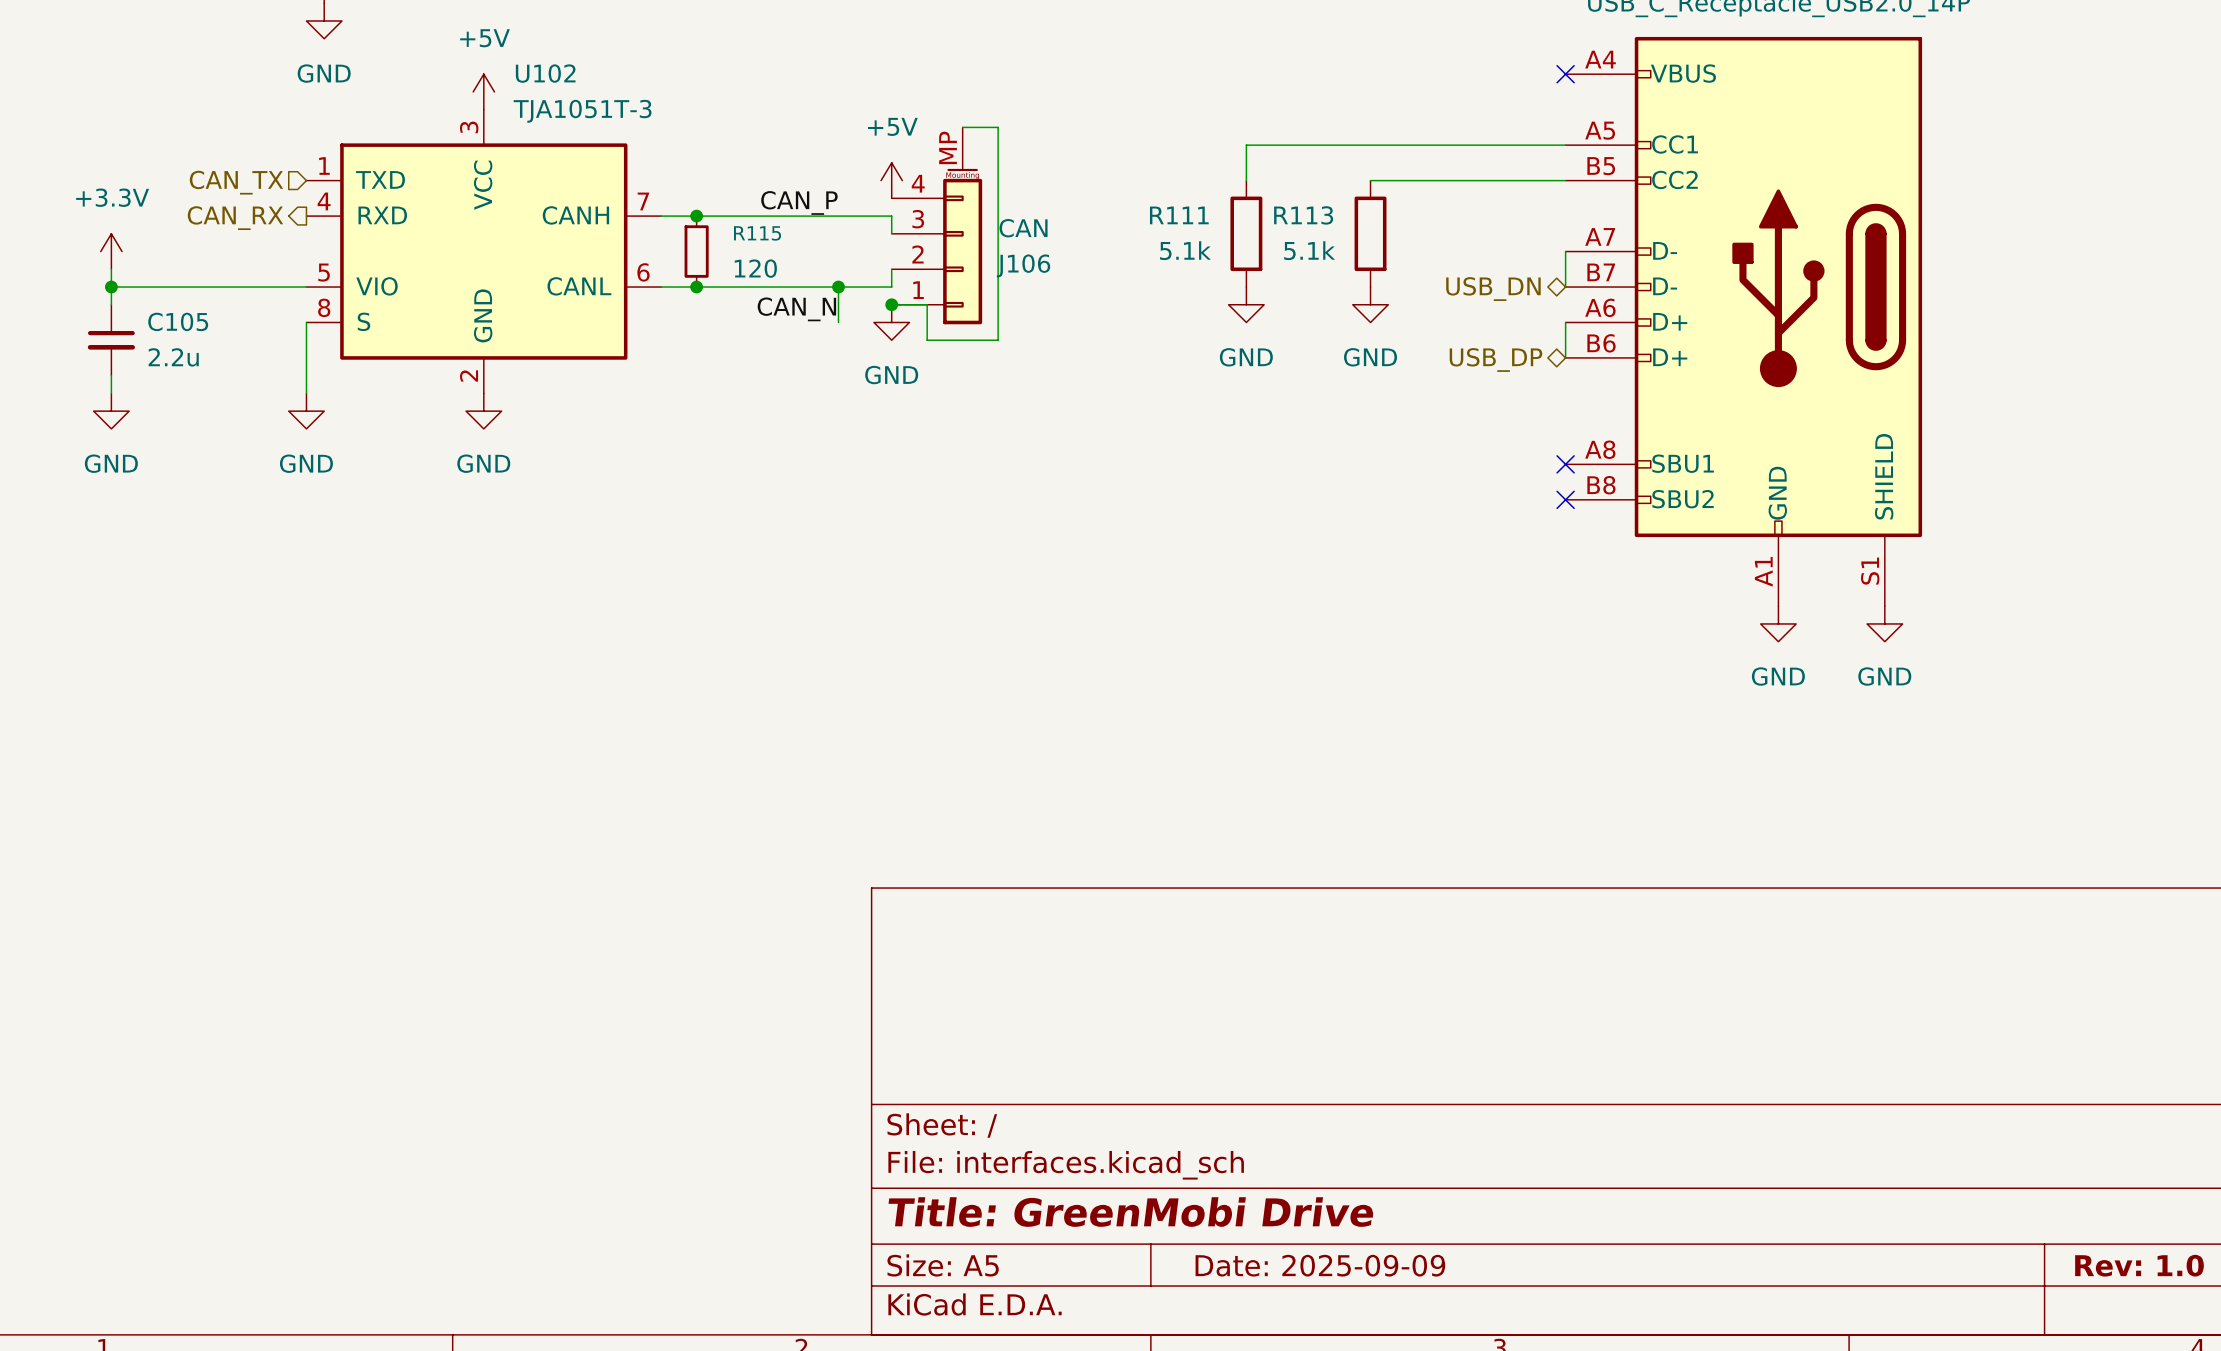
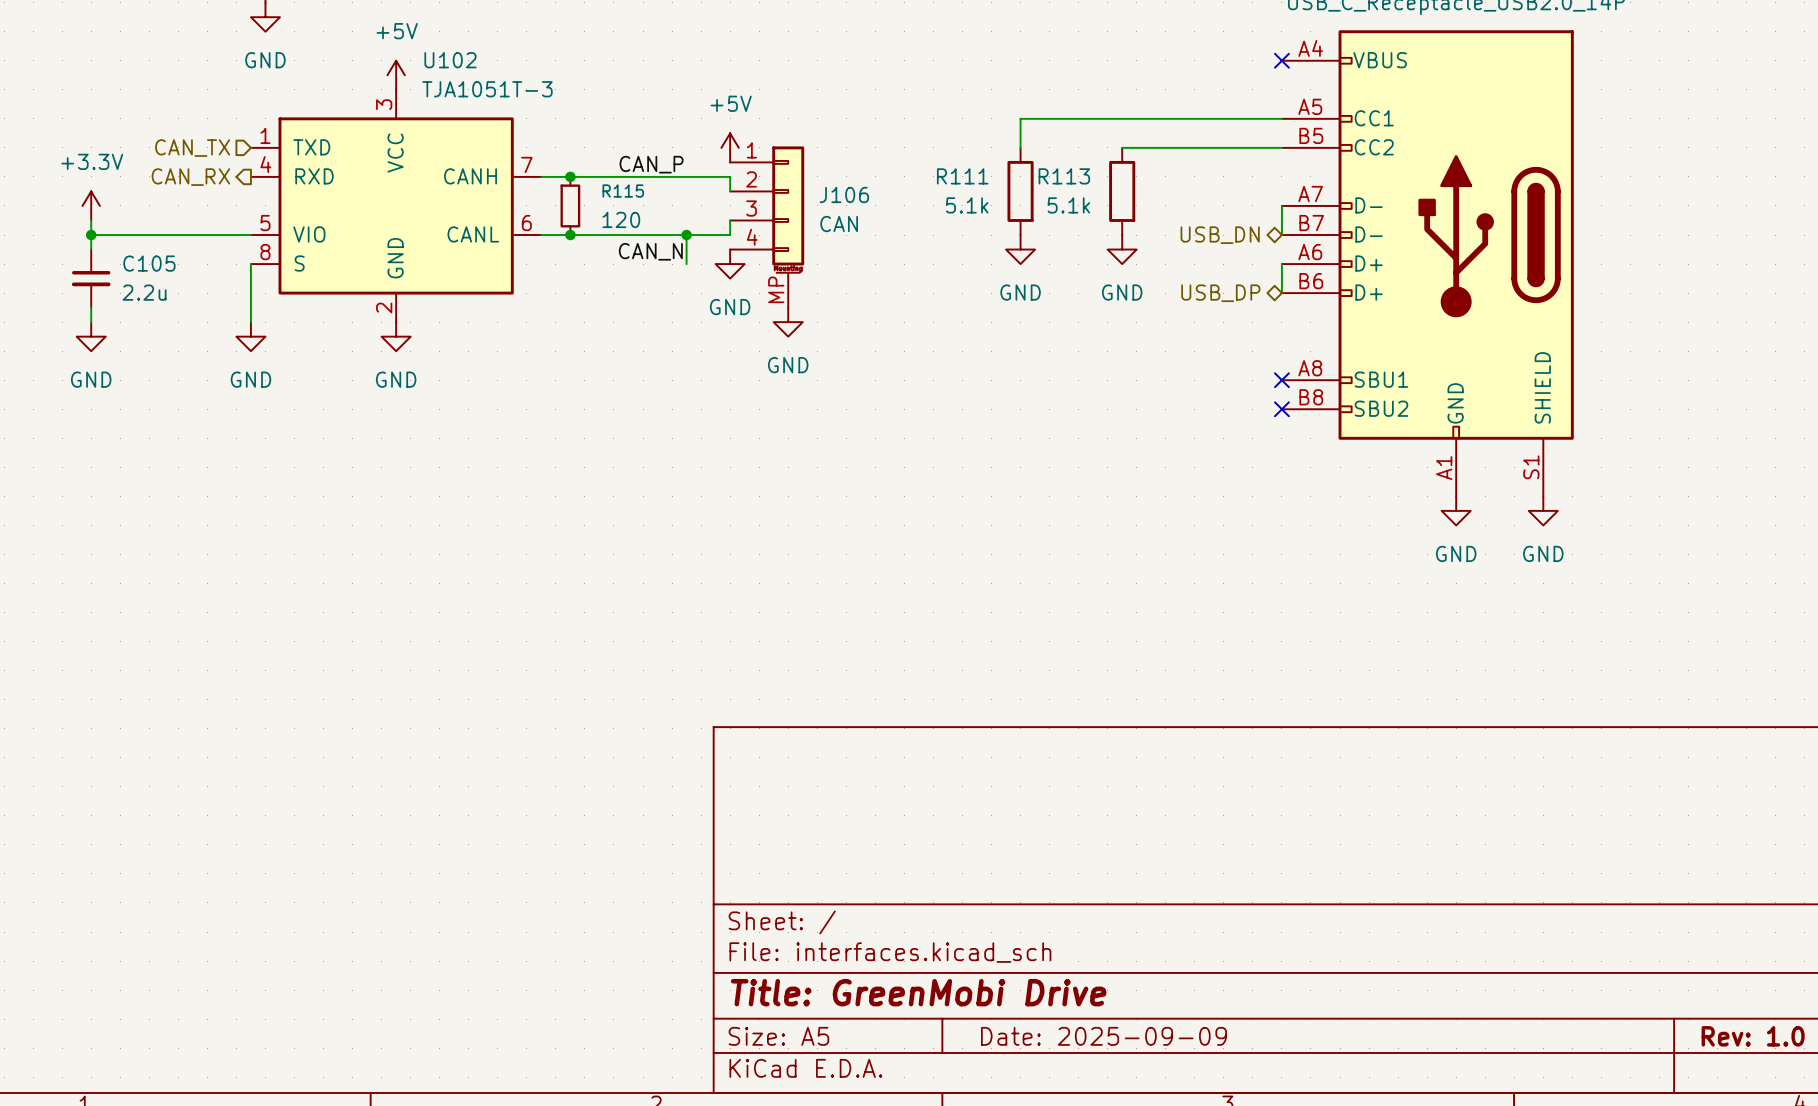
wire: (962, 127) (998, 127) (998, 340) (927, 340) (927, 304) (891, 304) -> none
J106 flip: as is (962, 246) -> up-down (788, 210)
junction: (891, 304) -> none
power symbol: none -> GND (788, 322)

